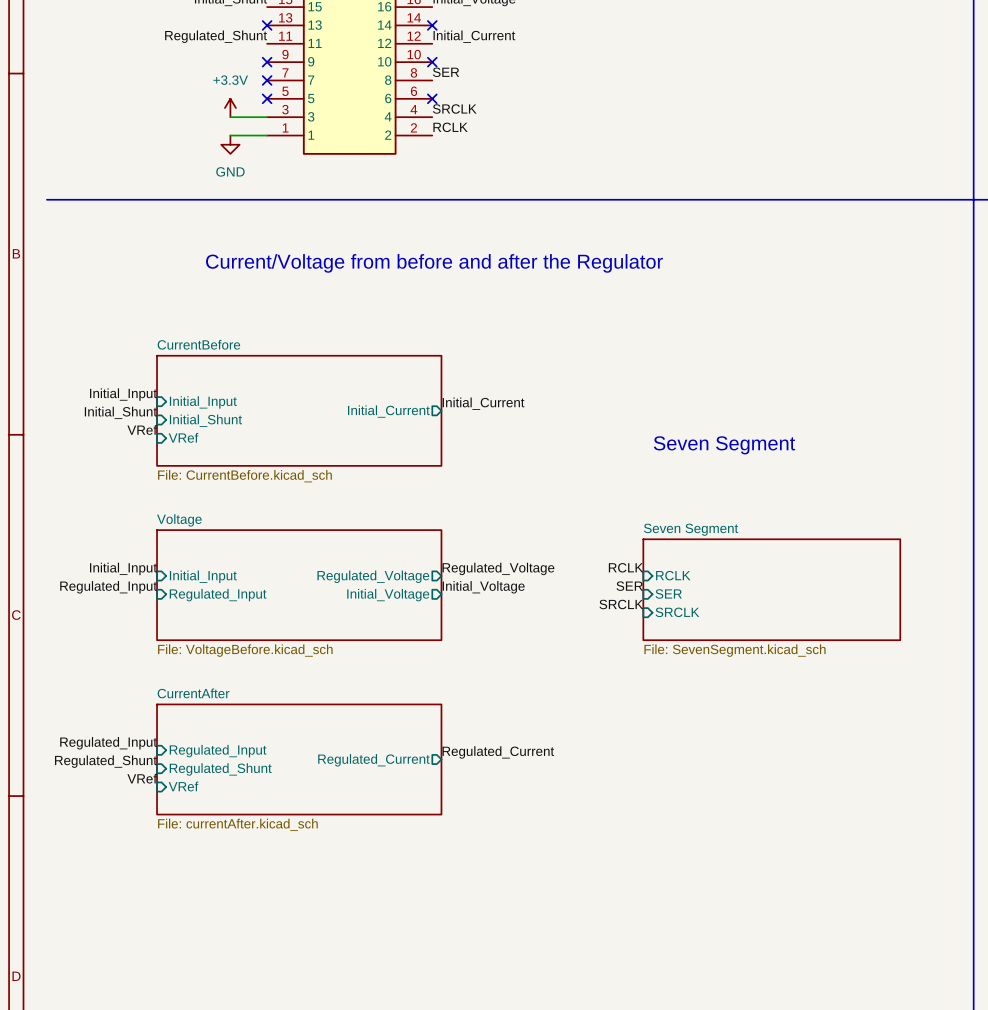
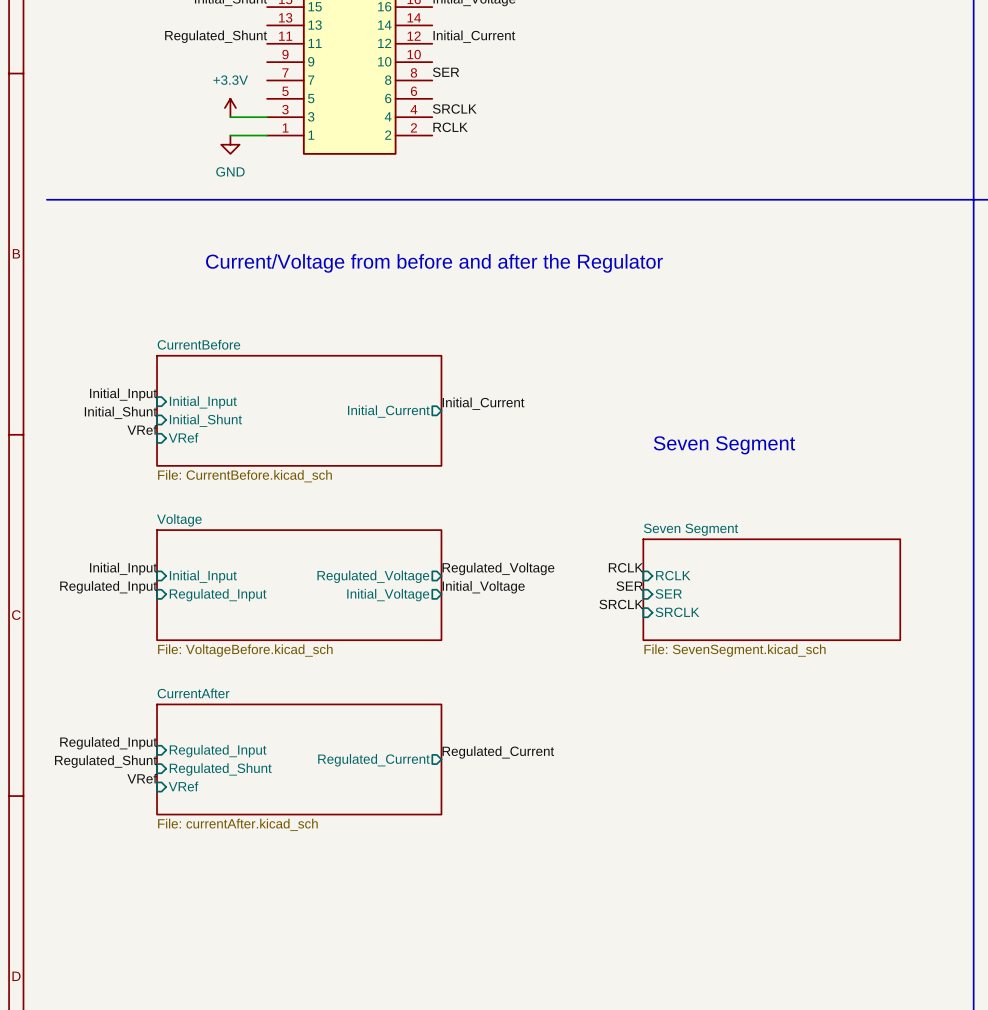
no-connect mark: (267, 25) -> none
no-connect mark: (432, 25) -> none
no-connect mark: (267, 62) -> none
no-connect mark: (432, 62) -> none
no-connect mark: (267, 80) -> none
no-connect mark: (267, 98) -> none
no-connect mark: (432, 98) -> none

